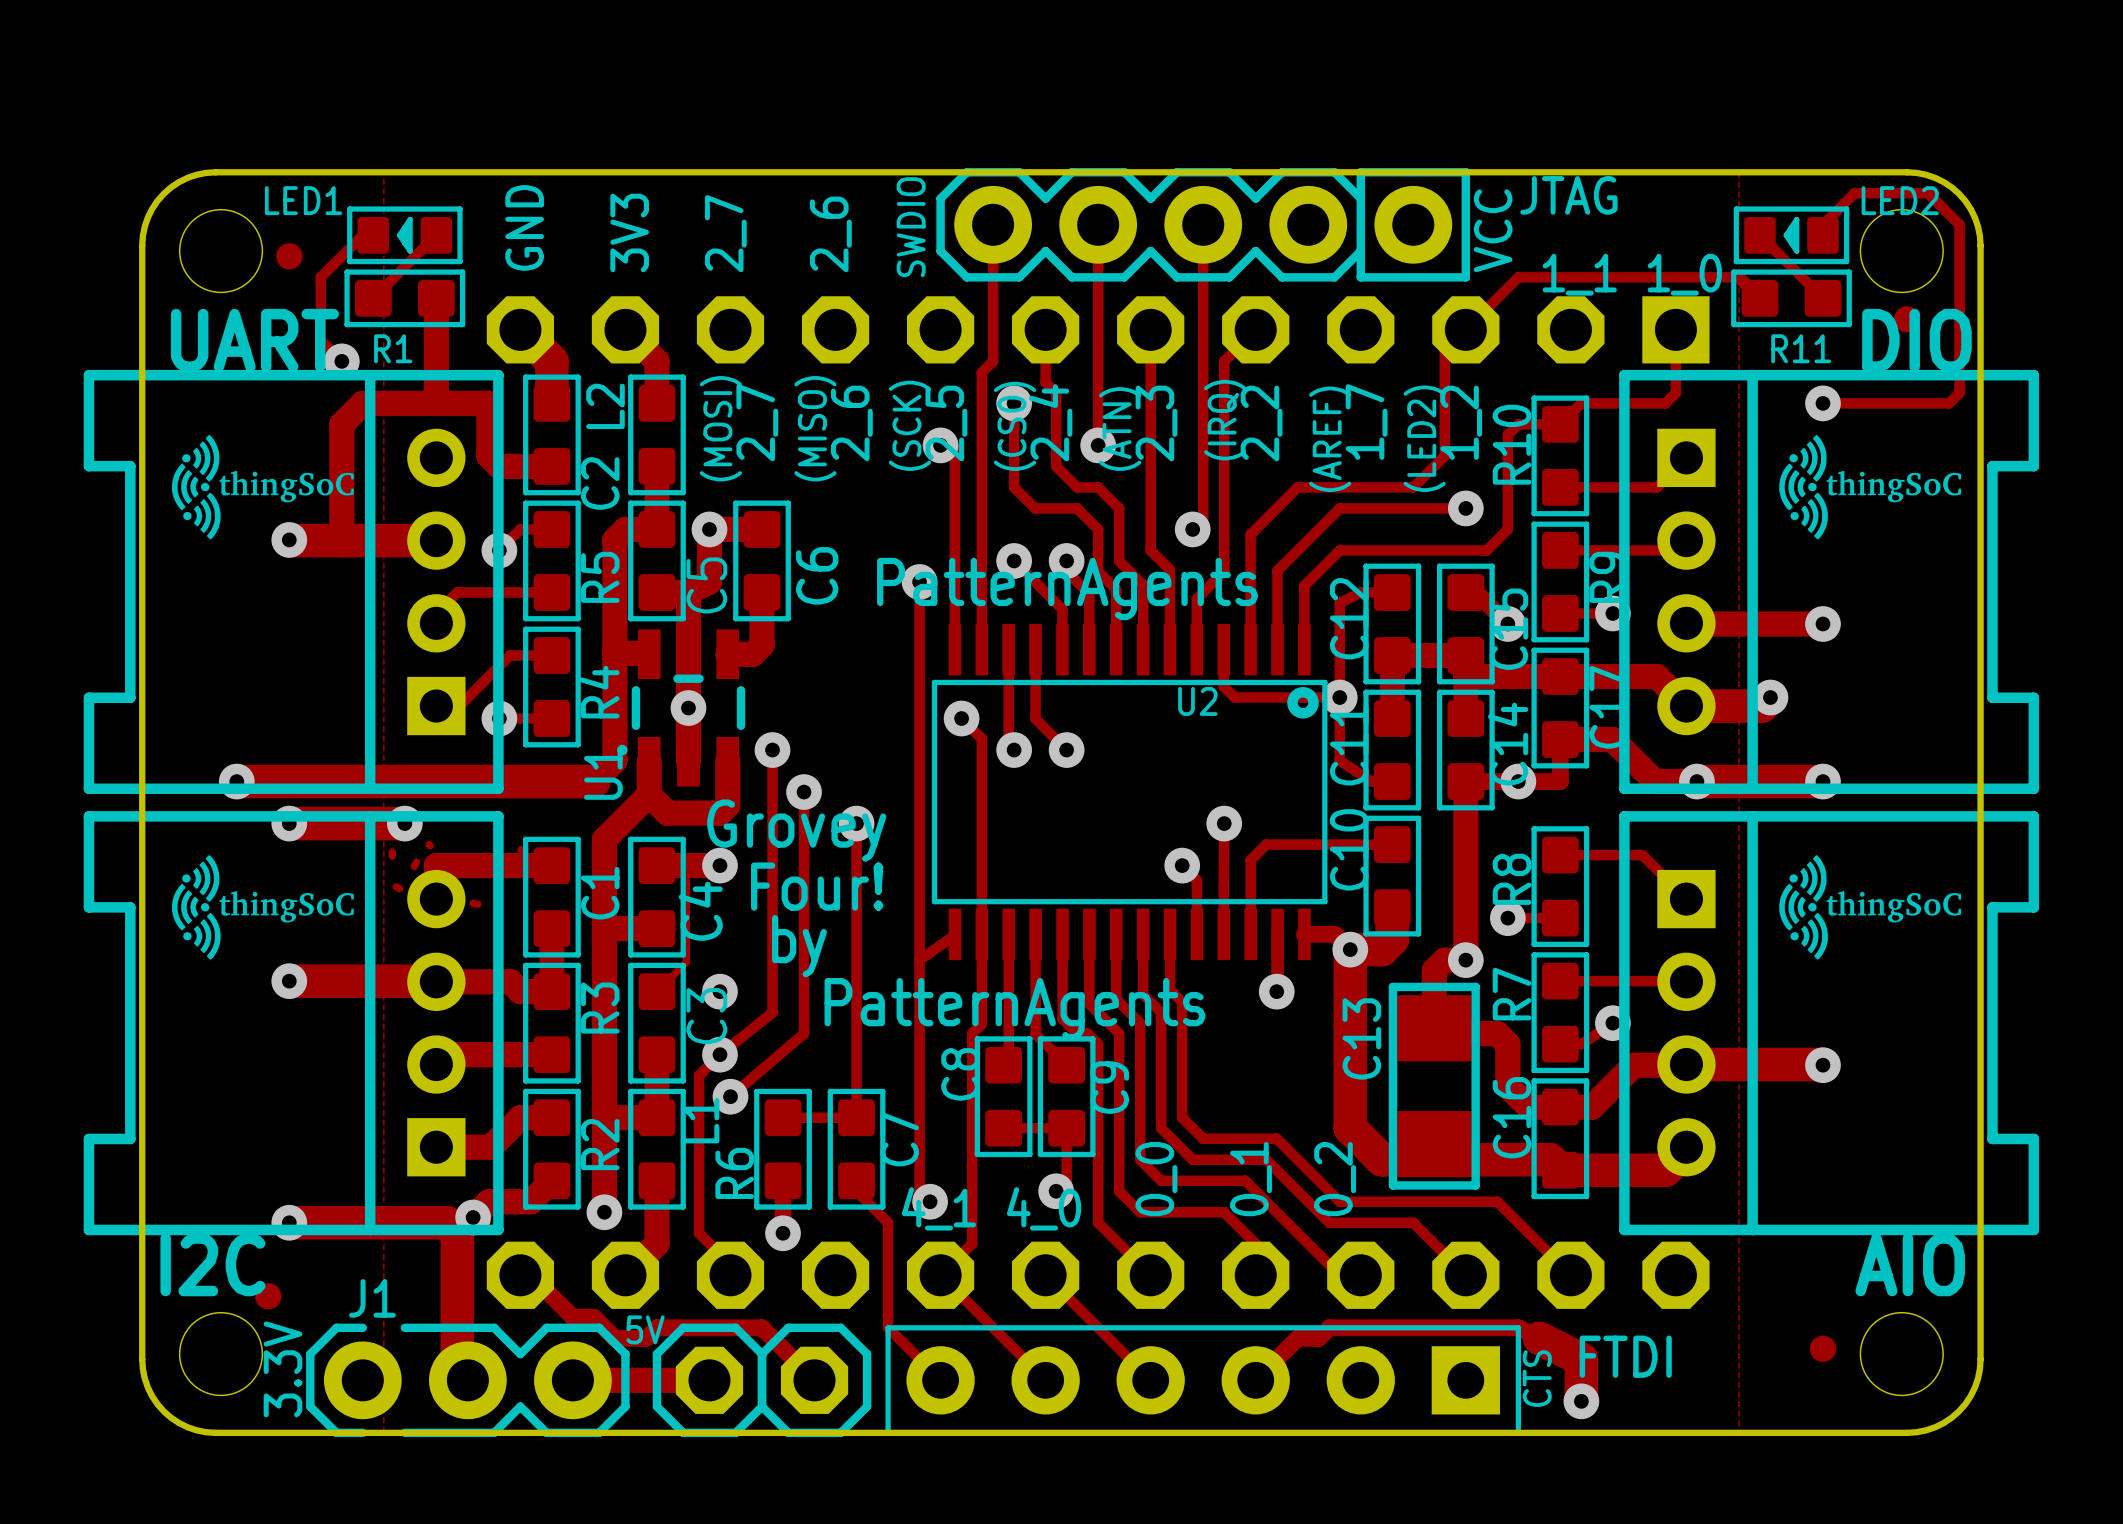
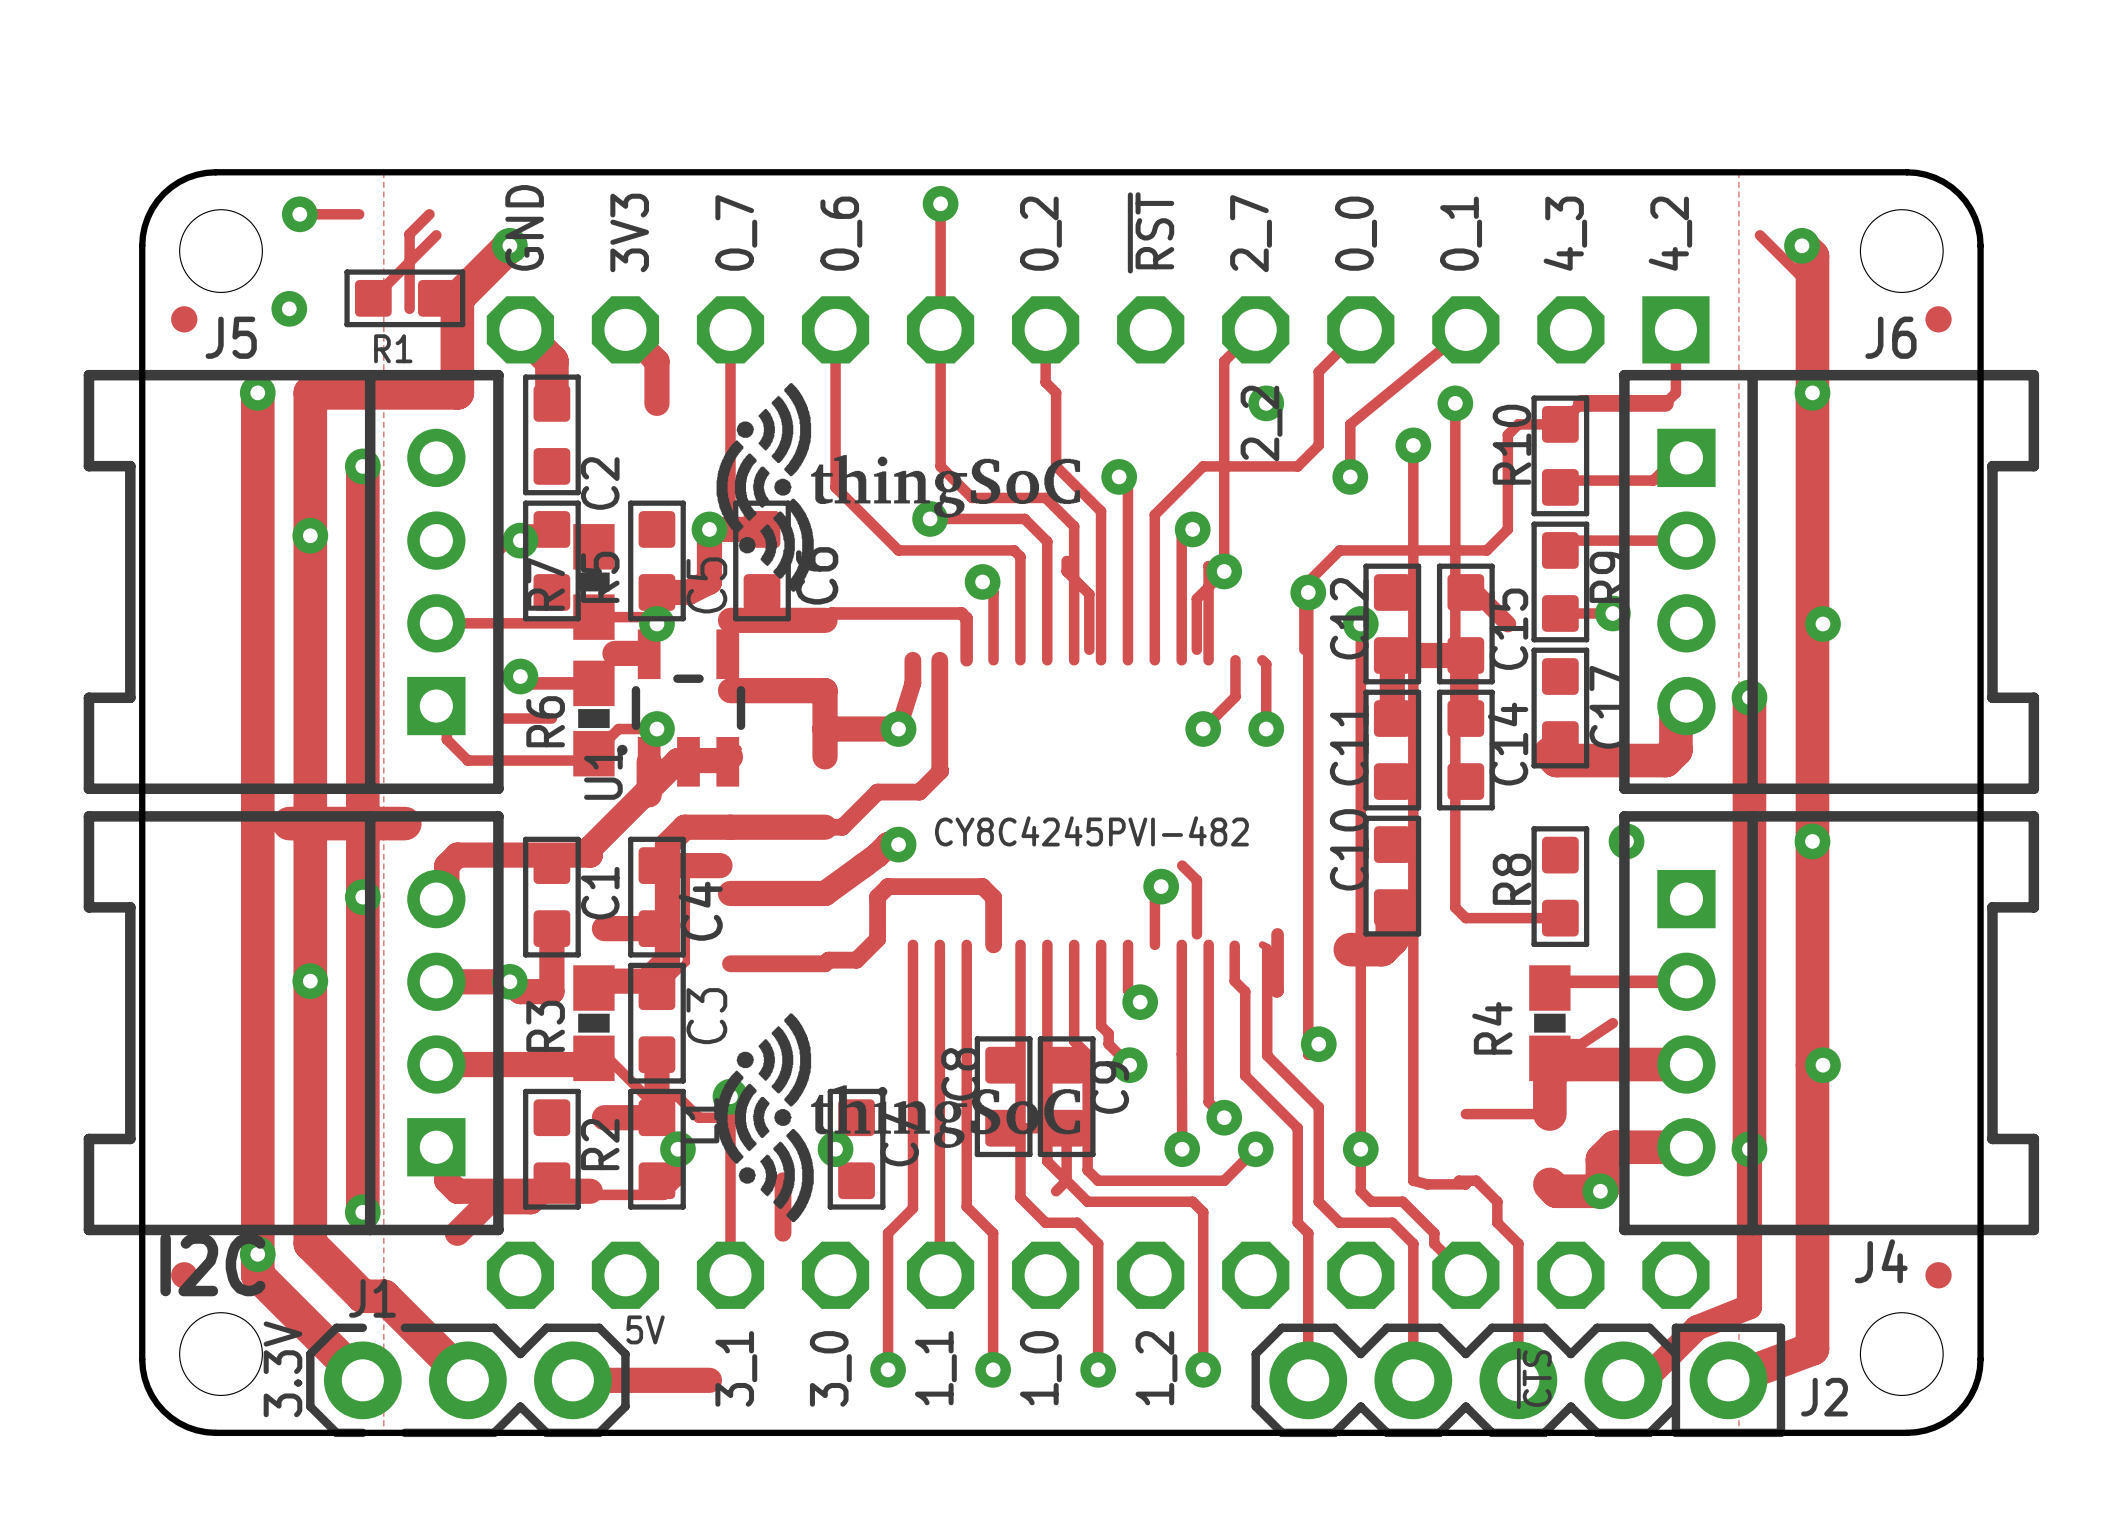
track: none -> (940, 203) (940, 466) (972, 497) (1045, 497) (1074, 526) (1074, 660)
via: none -> (940, 203)
track: none -> (299, 214) (359, 214)
via: none -> (299, 214)
track: none -> (429, 214) (409, 234) (409, 308)
track: (993, 224) (993, 361) (981, 372) (981, 649) -> none
track: (1098, 224) (1098, 445) -> none
track: (1203, 224) (1203, 518) (1192, 529) -> (1181, 660) (1181, 529) (1192, 529)
JTAG: (1203, 224) -> none
text: SWDIO (911, 227) -> none
text: VCC (1493, 230) -> none
text: none -> ~{RST} (1151, 232)
text: 2_7 (725, 233) -> 0_7 (736, 232)
text: none -> 2_7 (1251, 233)
text: none -> 4_3 (1565, 233)
text: none -> 4_2 (1670, 233)
text: 2_6 (830, 234) -> 0_6 (841, 233)
track: (373, 235) (362, 235) (320, 277) (320, 340) (341, 361) -> none
LED1: (404, 235) -> none
LED2: (1791, 235) -> none
track: (1822, 235) (1822, 224) (1854, 193) (1928, 193) (1959, 224) (1959, 392) (1949, 403) (1822, 403) -> none
via: none -> (509, 245)
track: none -> (1801, 245) (1812, 256) (1812, 1348) (1728, 1380)
via: none -> (1801, 245)
part position: (289, 256) -> (184, 319)
text: 1_1 (1579, 274) -> none
text: 1_0 (1684, 274) -> none
track: (436, 298) (436, 403) -> none
track: (1759, 298) (1738, 277) (1518, 277) (1444, 350) (1444, 455) (1413, 487) (1297, 487) (1250, 534) (1250, 649) -> none
R11: (1791, 298) -> none
via: none -> (289, 308)
part position: (1907, 319) -> (1938, 319)
track: none -> (730, 329) (730, 518)
track: none -> (835, 329) (835, 487) (898, 550) (1014, 550) (1020, 556) (1020, 660)
track: (1150, 329) (1150, 550) (1169, 569) (1169, 649) -> none
track: none -> (1360, 329) (1318, 371) (1318, 445) (1297, 466) (1203, 466) (1154, 514) (1154, 660)
track: none -> (1465, 329) (1350, 424) (1350, 476)
UART name: UART (254, 340) -> J5 (231, 337)
DIO name: DIO (1916, 340) -> J6 (1890, 337)
via: (341, 361) -> none
drawing: none -> [716, 383, 1081, 592]
track: none -> (257, 392) (257, 1275) (362, 1380)
via: none -> (257, 392)
track: (1014, 403) (1014, 487) (1035, 508) (1077, 508) (1098, 529) (1098, 571) (1116, 589) (1116, 649) -> none
via: (1014, 403) -> none
via: none -> (1266, 403)
track: none -> (1455, 403) (1455, 907) (1465, 918) (1507, 918)
via: none -> (1455, 403)
track width: thin (1581, 403) (1665, 403) -> thick (1581, 403) (1665, 403)
via position: (1822, 403) -> (1812, 392)
text: (IRQ) (1225, 420) -> none
text: 2_7 (757, 422) -> none
text: 2_4 (1050, 422) -> none
text: 1_7 (1366, 422) -> none
text position: 1_2 (1461, 422) -> 1_2 (1156, 1368)
text: 2_6 (851, 423) -> none
text: 2_5 (946, 423) -> none
text: 2_3 (1156, 423) -> none
text: (SCK) (909, 425) -> none
text: (CS0) (1015, 426) -> none
text: (MOSI) (720, 428) -> none
text: (MISO) (815, 428) -> none
text: (ATN) (1120, 429) -> none
L2: (656, 434) -> none
drawing: [172, 435, 354, 540] -> none
drawing: [1779, 435, 1962, 540] -> none
text: (LED2) (1424, 438) -> none
text: (AREF) (1330, 439) -> none
track: (940, 445) (954, 449) (954, 649) -> none
via: (940, 445) -> none
via position: (1098, 445) -> (1119, 476)
track: none -> (1413, 445) (1413, 1180) (1427, 1184) (1465, 1184) (1458, 1180) (1476, 1180) (1497, 1201) (1497, 1222) (1518, 1243) (1518, 1380)
via: none -> (1413, 445)
track: none -> (1675, 457) (1653, 480) (1549, 480)
track: (1686, 457) (1656, 487) (1560, 487) -> none
track: none -> (362, 466) (362, 1212)
via: none -> (362, 466)
track: (551, 466) (499, 466) (488, 455) (488, 403) (362, 403) (341, 424) (341, 540) -> none
track: (656, 466) (656, 529) (625, 529) (614, 539) (614, 760) (593, 781) (236, 781) -> none
track: none -> (1119, 476) (1127, 485) (1127, 660)
via: none -> (1350, 476)
track: (1077, 487) (1098, 487) (1119, 508) (1119, 560) (1143, 584) (1143, 649) -> (1077, 487) (1101, 511) (1101, 660)
track: (1465, 508) (1339, 508) (1277, 570) (1277, 649) -> none
via: (1465, 508) -> none
track: none -> (930, 518) (1024, 518) (1047, 541) (1047, 660)
via: none -> (930, 518)
track: (289, 539) (436, 540) -> none
via position: (289, 539) -> (310, 535)
track: none -> (1675, 540) (1556, 540) (1549, 546)
track: (1686, 540) (1676, 550) (1560, 550) -> none
via position: (499, 550) -> (520, 540)
track: (1014, 560) (1062, 609) (1062, 649) -> none
via position: (1014, 560) -> (982, 581)
via: (1066, 560) -> none
track: none -> (1224, 571) (1208, 566) (1208, 660)
via: none -> (1224, 571)
track: (919, 581) (919, 1191) (930, 1201) -> none
via: (919, 581) -> none
track: none -> (982, 581) (993, 592) (993, 660)
text: PatternAgents (1067, 588) -> none
track: (551, 592) (457, 592) (436, 613) (436, 623) -> none
track: (688, 592) (688, 761) -> none
track: (762, 592) (762, 645) (752, 654) (727, 654) -> none
track: none -> (1308, 592) (1308, 1054) (1318, 1044)
via: none -> (1308, 592)
track: (1392, 592) (1360, 592) (1339, 602) (1339, 760) (1371, 781) (1392, 781) -> none
track: none -> (730, 620) (825, 620) (831, 613) (961, 613) (966, 618) (966, 660)
track: none -> (446, 623) (587, 623) (593, 617) (650, 617) (656, 623)
via: none -> (656, 623)
via: none -> (1360, 623)
via: (1507, 623) -> none
track: (1686, 623) (1822, 623) -> none
R4 footprint: [523, 626, 581, 748] -> [1529, 965, 1571, 1082]
track: (1008, 649) (1008, 744) (1014, 750) -> none
track: (1035, 649) (1035, 718) (1066, 750) -> none
track: (1223, 649) (1223, 686) (1234, 697) (1339, 697) -> none
track: (551, 655) (509, 655) (459, 706) (436, 706) -> none
track: none -> (912, 660) (912, 683) (898, 729) (825, 729)
track: none -> (939, 660) (940, 771) (919, 792) (877, 792) (842, 827) (684, 827) (667, 844) (667, 960) (646, 981) (600, 981) (593, 988) (587, 981)
track: none -> (1235, 660) (1235, 696) (1203, 729)
track: none -> (1262, 660) (1266, 664) (1266, 729)
track: none -> (520, 676) (527, 683) (593, 683)
track: (1465, 676) (1656, 676) (1686, 706) (1761, 706) (1770, 697) -> none
R4 name position: R4 (599, 692) -> R4 (1492, 1028)
track: none -> (735, 695) (737, 697) (730, 690) (825, 690) (825, 756)
via: (1339, 697) -> none
track: none -> (1749, 697) (1749, 1306) (1696, 1327) (1644, 1380) (1623, 1380)
via position: (1770, 697) -> (1749, 697)
track: none -> (446, 706) (446, 739) (467, 760) (587, 760) (618, 729) (656, 729)
track: none -> (1675, 706) (1675, 750) (1665, 760) (1556, 760) (1549, 753)
via position: (688, 708) -> (656, 729)
via position: (499, 718) -> (520, 676)
track: (961, 718) (981, 738) (981, 1023) (972, 1033) (972, 1243) (940, 1275) (1045, 1380) -> none
via: (961, 718) -> none
via: none -> (898, 729)
via: none -> (1203, 729)
via: none -> (1266, 729)
track: none -> (735, 748) (737, 748) (726, 760) (677, 760) (590, 848) (590, 855) (457, 855) (446, 865) (446, 899)
track: (772, 750) (772, 1012) (719, 1054) (698, 1075) (698, 1233) (730, 1264) -> (446, 1064) (587, 1064) (593, 1058) (608, 1058) (646, 1096) (677, 1096) (698, 1117) (730, 1117) (730, 1264)
via: (772, 750) -> none
via: (1014, 750) -> none
via: (1066, 750) -> none
track: (727, 761) (727, 805) (719, 813) (667, 813) (649, 794) (604, 839) (604, 1212) -> none
via: (236, 781) -> none
via: (1518, 781) -> none
via: (1696, 781) -> none
track: (1822, 781) (1654, 781) (1612, 739) (1560, 739) (1560, 781) (1465, 781) (1465, 960) (1444, 960) (1434, 970) (1434, 1028) (1439, 1033) (1497, 1033) (1507, 1044) (1507, 1086) (1528, 1107) (1591, 1107) (1633, 1065) (1822, 1065) -> none
via: (1822, 781) -> none
track: (804, 792) (804, 1033) (730, 1096) -> none
via: (804, 792) -> none
U2: (1129, 792) -> none
via: (289, 823) -> none
via: (404, 823) -> none
track: (856, 823) (856, 1117) (783, 1117) -> none
via position: (856, 823) -> (898, 844)
track: (1224, 823) (1223, 934) -> none
via: (1224, 823) -> none
text: Grovey (796, 830) -> none
text: none -> CY8C4245PVI-482 (1091, 831)
via: none -> (1626, 841)
via: none -> (1812, 841)
track: (429, 844) (430, 845) -> none
track: none -> (898, 844) (888, 844) (877, 855) (825, 893)
track: (1392, 844) (1266, 844) (1250, 860) (1250, 934) -> none
track: (520, 849) (524, 851) -> none
track: (392, 851) (392, 856) -> none
drawing: [172, 855, 354, 960] -> none
track: (1560, 855) (1642, 855) (1686, 899) -> none
drawing: [1779, 855, 1962, 960] -> none
track: (416, 862) (414, 866) -> none
track: (551, 865) (436, 865) (436, 899) (429, 896) (433, 896) -> none
via: (719, 865) -> none
via position: (1182, 865) -> (1161, 886)
track: (396, 886) (399, 888) -> none
text: Four! (817, 886) -> none
track: none -> (1161, 886) (1154, 892) (1154, 944)
track: none -> (730, 893) (825, 893)
via: none -> (362, 897)
track: (473, 903) (477, 904) -> none
via: (1507, 918) -> none
track: (954, 934) (919, 960) -> none
track: (1008, 934) (1008, 1060) (1003, 1065) -> none
track: (1035, 934) (1035, 1034) (1066, 1065) -> none
track: (1062, 934) (1062, 1019) (1077, 1033) (1087, 1033) (1098, 1044) (1098, 1222) (1150, 1275) -> none
track: (1089, 934) (1089, 1003) (1119, 1033) (1119, 1191) (1140, 1212) (1224, 1212) (1255, 1243) (1255, 1275) -> none
track: (1116, 934) (1116, 999) (1140, 1023) (1140, 1159) (1161, 1180) -> (1074, 944) (1074, 1041) (1087, 1054) (1087, 1170) (1098, 1180) (1161, 1180)
track: (1143, 934) (1143, 994) (1161, 1012) (1161, 1128) (1192, 1159) (1266, 1159) (1329, 1222) (1339, 1222) -> (1262, 944) (1267, 947) (1267, 1055) (1318, 1107) (1318, 1201) (1339, 1222)
track: (1170, 934) (1170, 990) (1182, 1002) (1182, 1117) (1203, 1138) (1276, 1138) (1339, 1201) (1371, 1201) -> (1360, 623) (1360, 1191) (1371, 1201)
track: (1304, 934) (1335, 934) (1350, 949) (1350, 1128) (1381, 1159) (1434, 1159) (1434, 1144) -> none
track: none -> (939, 944) (940, 1275)
track: none -> (966, 944) (966, 1206) (993, 1233) (993, 1369)
track: none -> (993, 944) (993, 897) (982, 886) (888, 886) (877, 897) (877, 939) (856, 960) (828, 960) (825, 963) (730, 963)
track: none -> (1020, 944) (1020, 1197) (1045, 1222) (1077, 1222) (1098, 1243) (1098, 1369)
track: none -> (1047, 944) (1047, 1161) (1087, 1201) (1192, 1201) (1203, 1212) (1203, 1369)
track: none -> (1101, 944) (1101, 1026) (1108, 1033) (1108, 1044) (1129, 1065)
track: none -> (1128, 944) (1128, 990) (1140, 1002)
track: none -> (1181, 944) (1182, 1149)
track: none -> (1208, 944) (1208, 1102) (1224, 1117)
track: none -> (1234, 945) (1234, 981) (1245, 991) (1245, 1075) (1297, 1128) (1297, 1222) (1308, 1233) (1308, 1380)
text: by (799, 946) -> none
via: (1350, 949) -> none
R7 footprint: [1531, 952, 1590, 1074] -> [573, 524, 615, 640]
via: (1465, 960) -> none
R3 footprint: [523, 962, 581, 1084] -> [573, 965, 615, 1082]
track: (289, 981) (435, 981) -> none
via position: (289, 981) -> (310, 981)
via: none -> (509, 981)
track: (1560, 981) (1686, 981) -> none
track: none -> (1675, 981) (1556, 981) (1549, 988)
via: (719, 991) -> none
via: (1276, 991) -> none
via: none -> (1140, 1002)
R3 name position: R3 (600, 1008) -> R3 (545, 1026)
text: PatternAgents (1014, 1009) -> none
drawing: none -> [716, 1013, 1081, 1222]
via: (1612, 1023) -> none
via: none -> (1318, 1044)
track: (551, 1054) (446, 1054) (436, 1064) -> none
via: (719, 1054) -> none
via: none -> (1129, 1065)
track: none -> (1676, 1065) (1556, 1064) (1549, 1058) (1549, 1114) (1465, 1114)
C13: (1434, 1086) -> none
R6 footprint: [754, 1088, 812, 1210] -> [573, 660, 615, 777]
track: (551, 1117) (520, 1117) (490, 1147) (436, 1147) -> none
via: none -> (1224, 1117)
C16: (1560, 1138) -> none
track: (1434, 1144) (1449, 1159) (1549, 1159) (1560, 1170) (1665, 1170) (1686, 1147) -> none
track: none -> (446, 1147) (446, 1180) (457, 1191) (590, 1191) (593, 1194) (663, 1194) (677, 1180) (677, 1149)
track: none -> (1675, 1147) (1614, 1147) (1602, 1159) (1602, 1189) (1600, 1191) (1556, 1191) (1549, 1184)
via: none -> (677, 1149)
via: none -> (835, 1149)
via: none -> (1182, 1149)
via: none -> (1255, 1149)
via: none -> (1360, 1149)
via: none -> (1749, 1149)
text position: 0_0 (1156, 1179) -> 0_0 (1356, 233)
text position: 0_1 (1251, 1179) -> 0_1 (1461, 233)
text position: 0_2 (1335, 1179) -> 0_2 (1040, 233)
track: (656, 1180) (656, 1243) (625, 1275) -> none
track: (856, 1180) (856, 1191) (888, 1222) (888, 1233) -> (912, 944) (912, 1208) (888, 1233)
track: (1224, 1180) (1245, 1180) (1339, 1275) (1360, 1275) -> (1224, 1180) (1255, 1149)
via: (1056, 1191) -> none
via: none -> (1600, 1191)
via: (930, 1201) -> none
track: (1402, 1201) (1497, 1201) (1570, 1275) -> none
text: 4_1 (938, 1208) -> none
text: 4_0 (1044, 1208) -> none
via: none -> (362, 1212)
via: (604, 1212) -> none
via: (473, 1217) -> none
track: (289, 1222) (446, 1222) (457, 1233) (457, 1369) -> (509, 245) (457, 298) (457, 392) (310, 392) (310, 1243) (362, 1296) (383, 1296) (457, 1369)
via: (289, 1222) -> none
track: (1392, 1222) (1413, 1222) (1434, 1243) -> (1402, 1201) (1434, 1233) (1434, 1243)
track: none -> (1392, 1222) (1413, 1243) (1413, 1380)
via: (783, 1233) -> none
via: none -> (257, 1254)
AIO name: AIO (1910, 1264) -> J4 (1881, 1261)
track: (520, 1275) (530, 1275) (572, 1317) (593, 1317) (614, 1338) (646, 1338) (656, 1327) (762, 1327) (814, 1380) -> none
track: (1045, 1275) (1150, 1380) -> none
part position: (268, 1296) -> (184, 1275)
track: (888, 1327) (940, 1380) -> (888, 1327) (888, 1369)
part position: (1822, 1348) -> (1938, 1275)
text: none -> 3_1 (736, 1368)
text: none -> 3_0 (830, 1368)
text: none -> 1_1 (935, 1368)
text: none -> 1_0 (1040, 1368)
via: none -> (888, 1369)
via: none -> (993, 1369)
via: none -> (1098, 1369)
via: none -> (1203, 1369)
part: (709, 1380) -> none
part: (814, 1380) -> none
FTDI: (1203, 1380) -> none
track: (1255, 1380) (1297, 1338) (1318, 1338) (1329, 1327) (1518, 1327) (1581, 1359) (1581, 1401) -> none
part: none -> (1518, 1380)
text: none -> J2 (1824, 1397)
via: (1581, 1401) -> none

